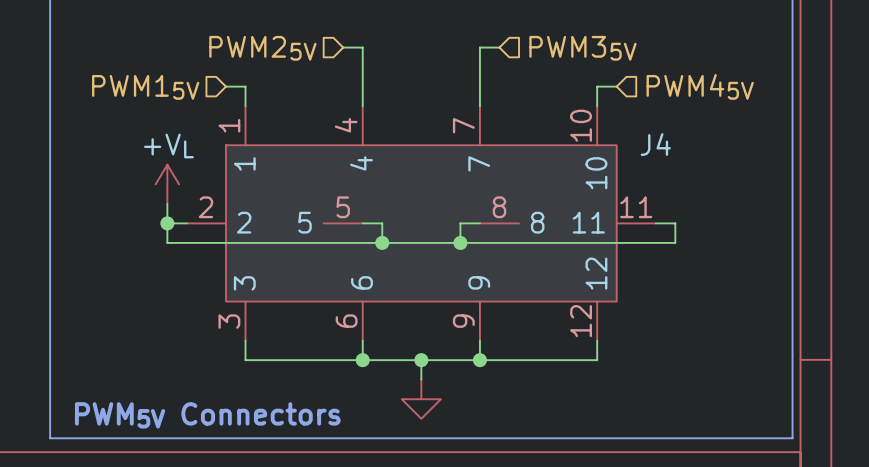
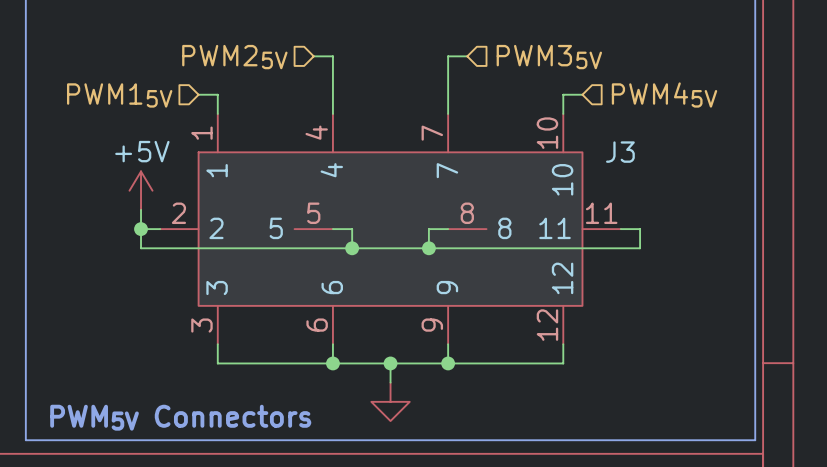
J4 name: J4 (655, 144) -> J3 (620, 152)
power symbol: +VL (167, 184) -> +5V (141, 190)

